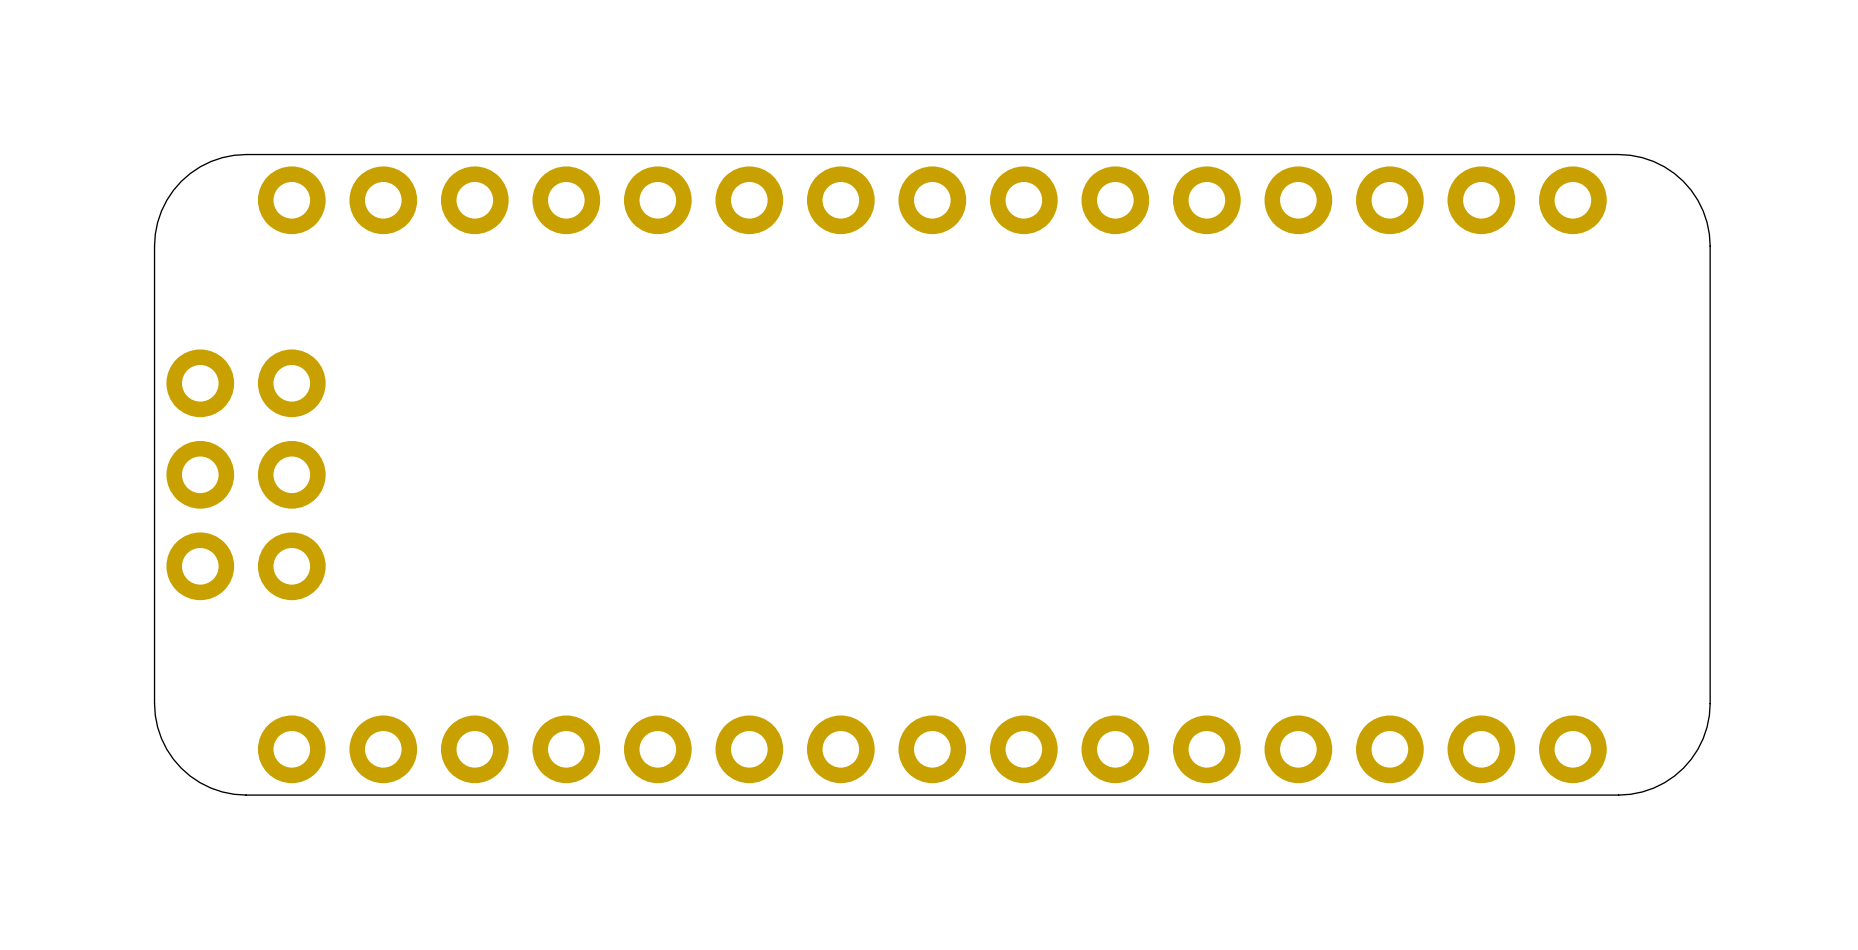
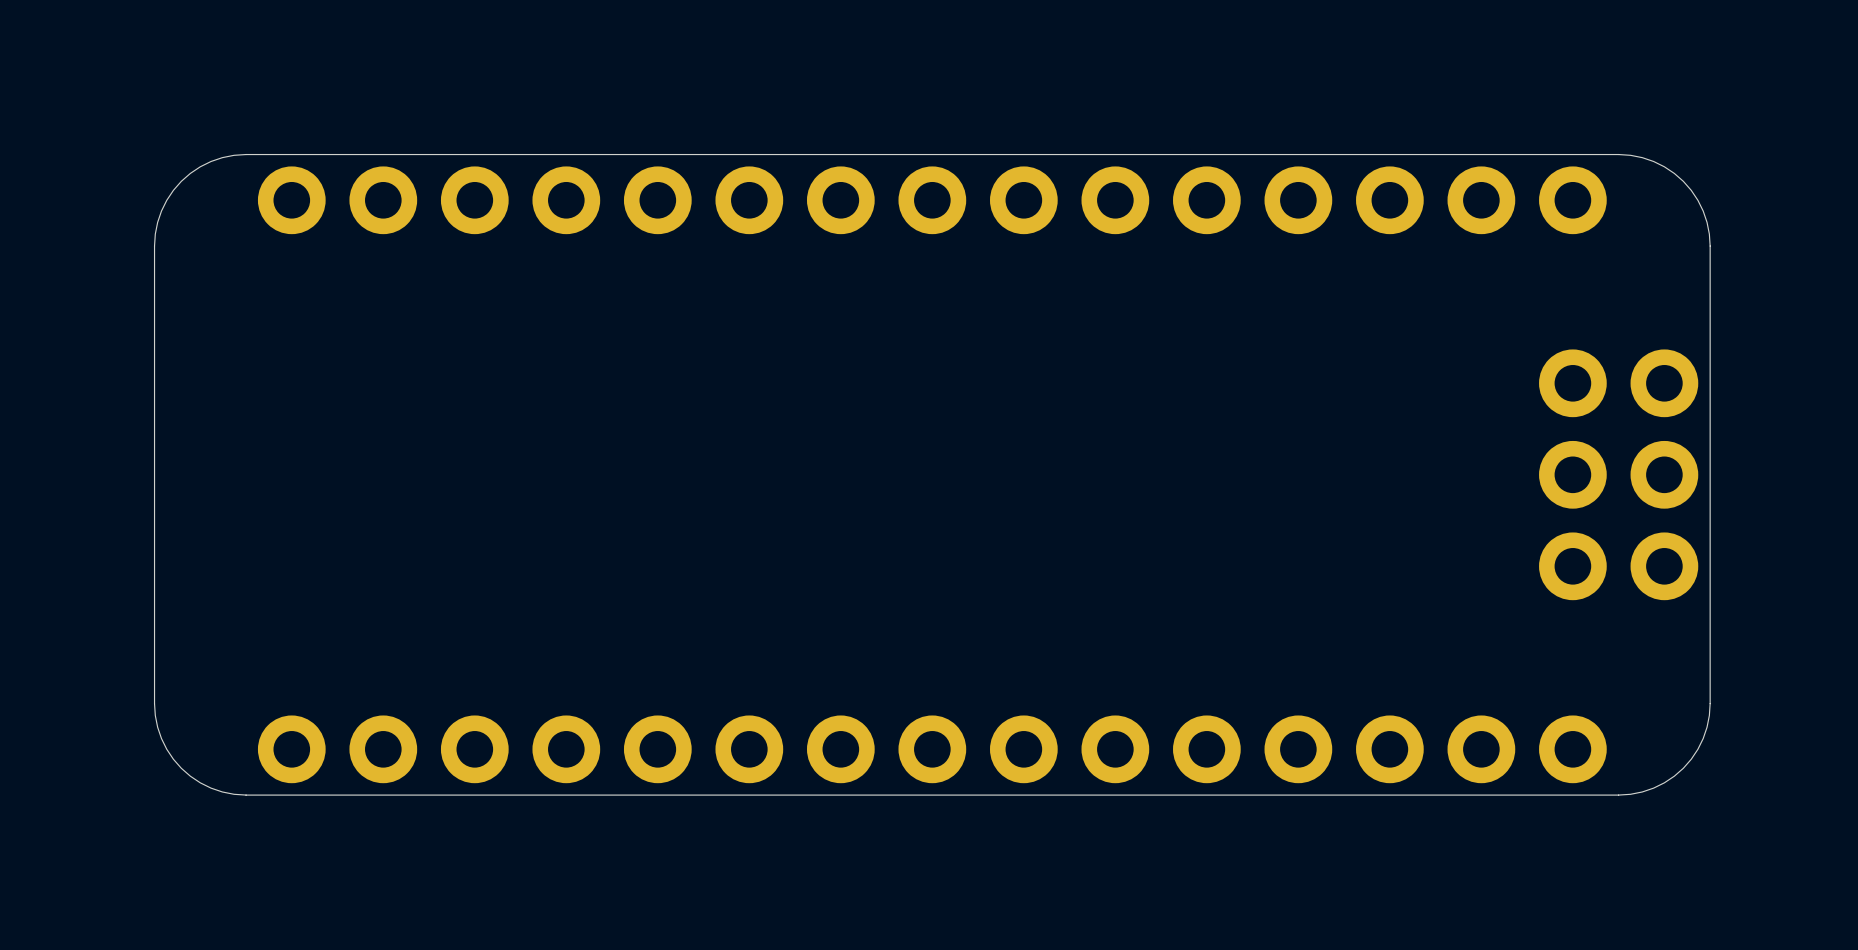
part: (200, 474) -> none
part: (291, 474) -> none
part: none -> (1572, 474)
part: none -> (1664, 474)

